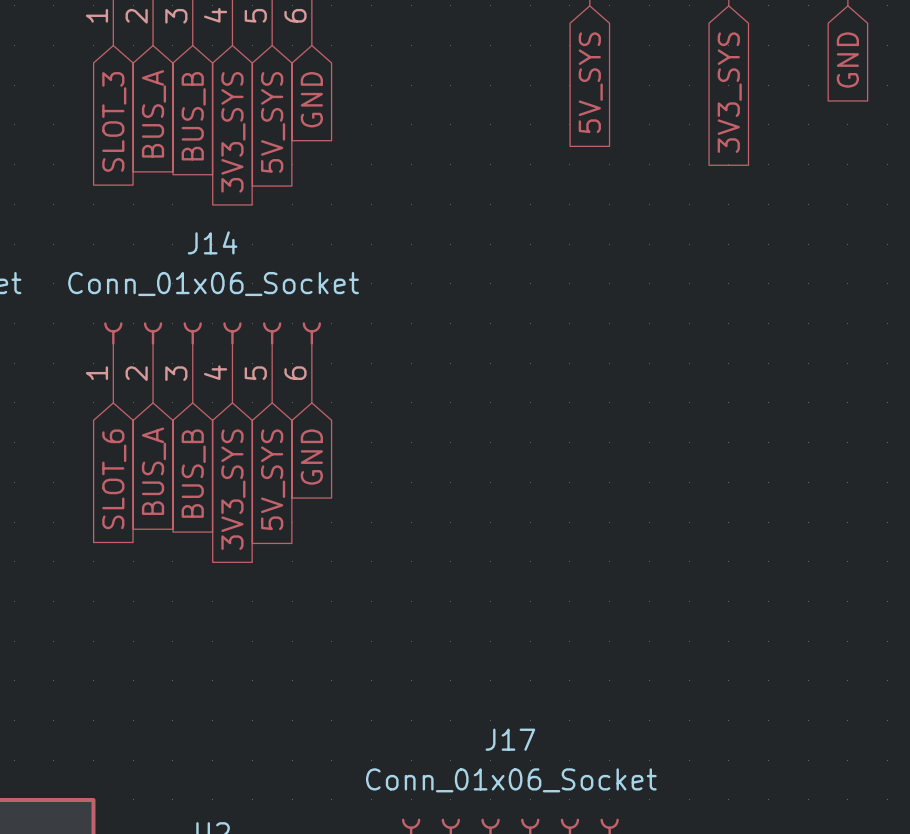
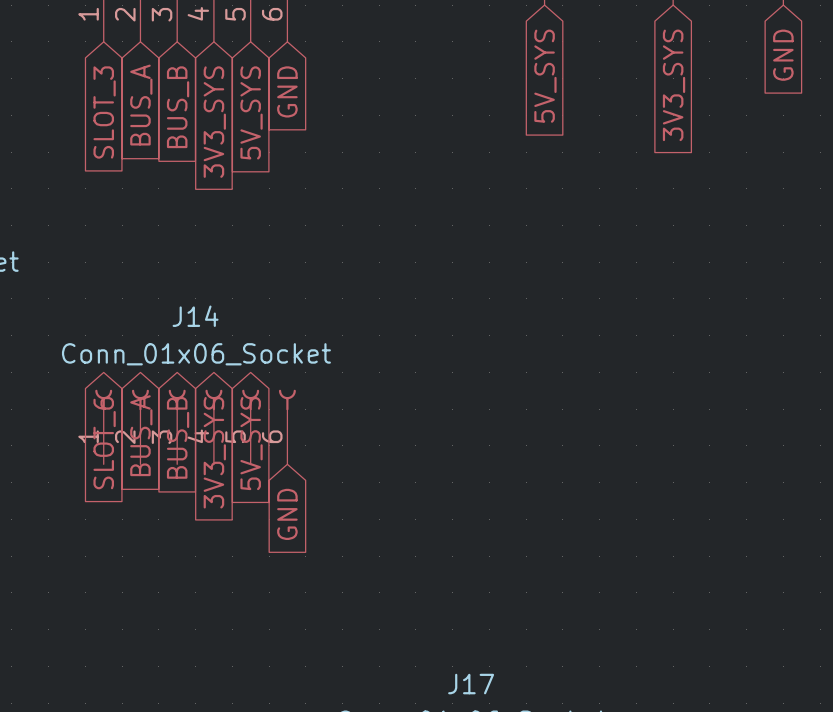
J14 position: (212, 362) -> (195, 427)
global label position: GND (311, 457) -> GND (287, 514)

